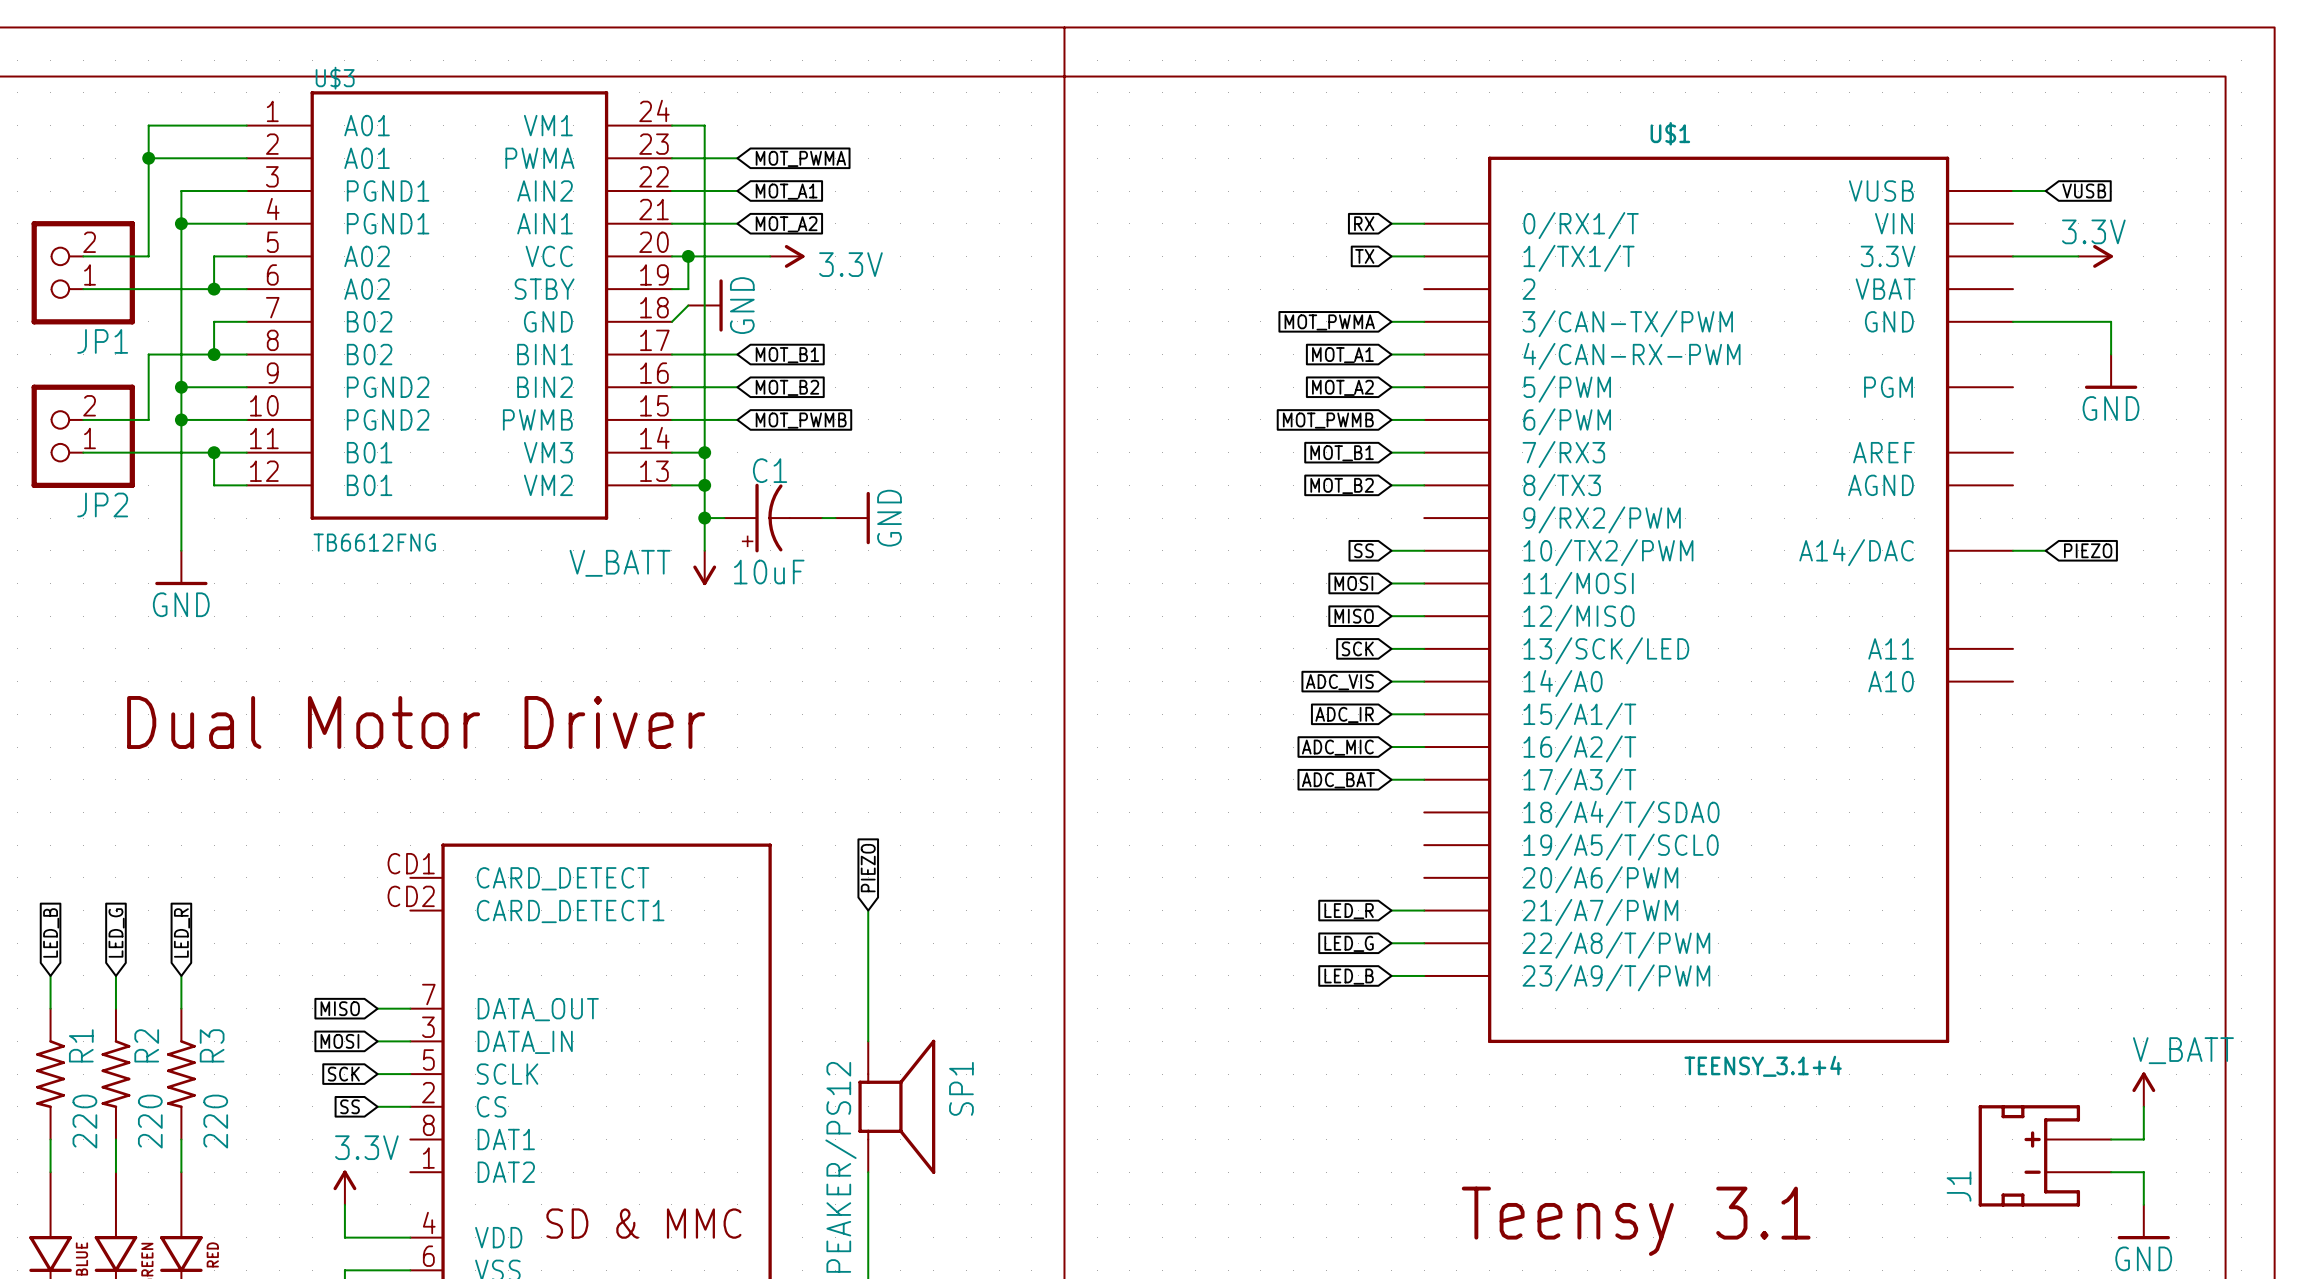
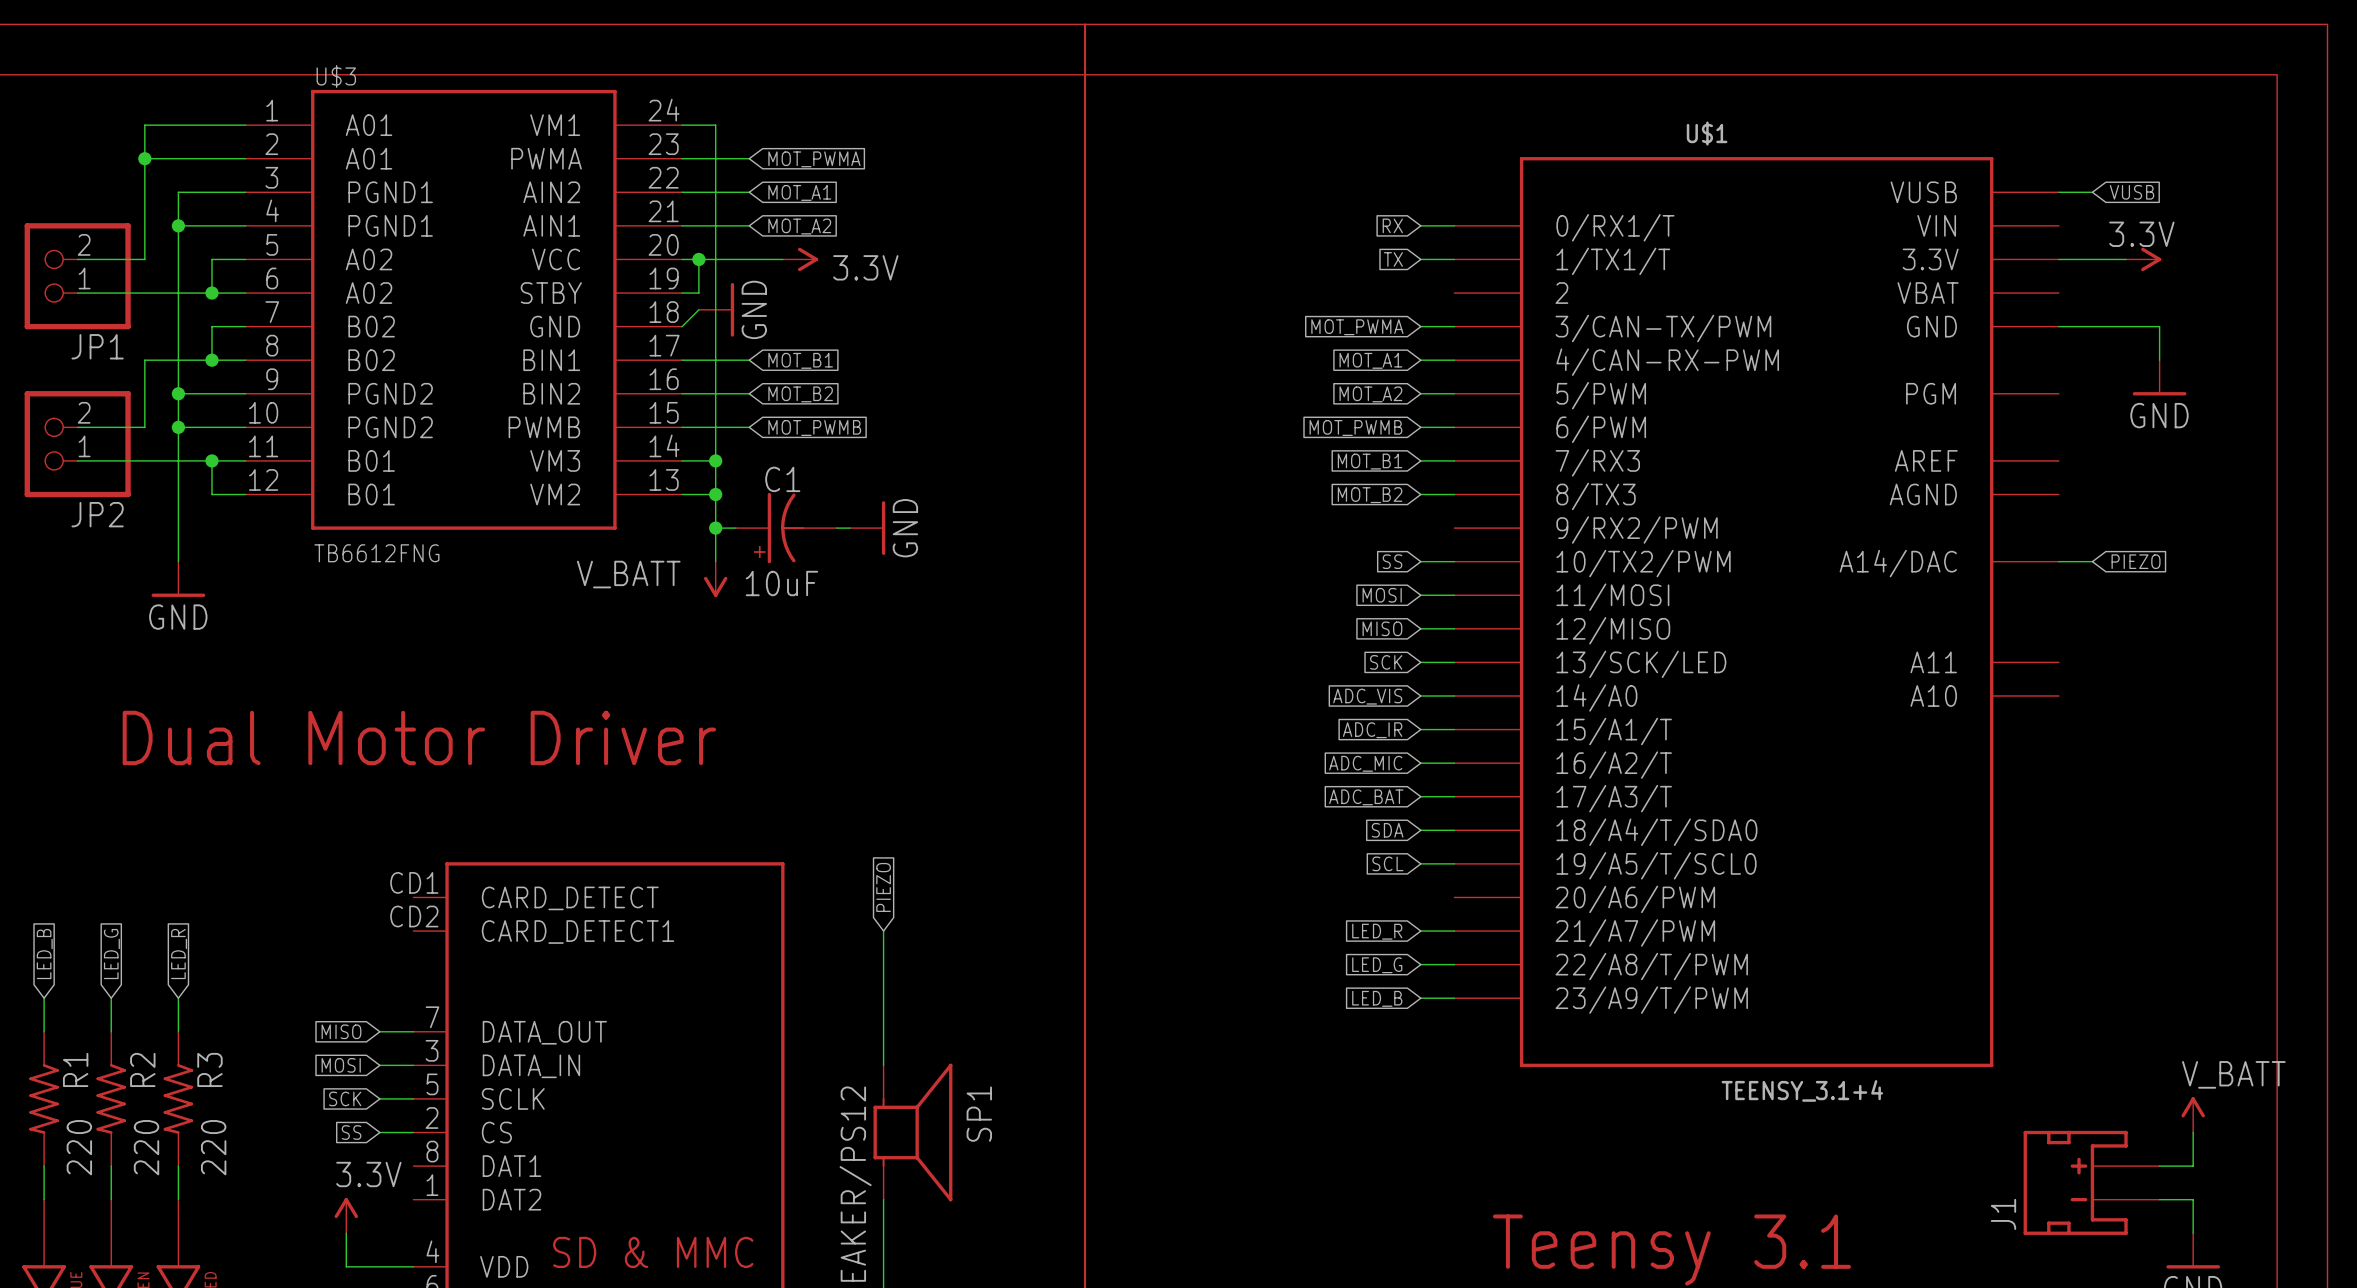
global label: none -> SDA (1387, 830)
wire: none -> (1420, 830) (1454, 830)
global label: none -> SCL (1387, 863)
wire: none -> (1420, 863) (1454, 863)

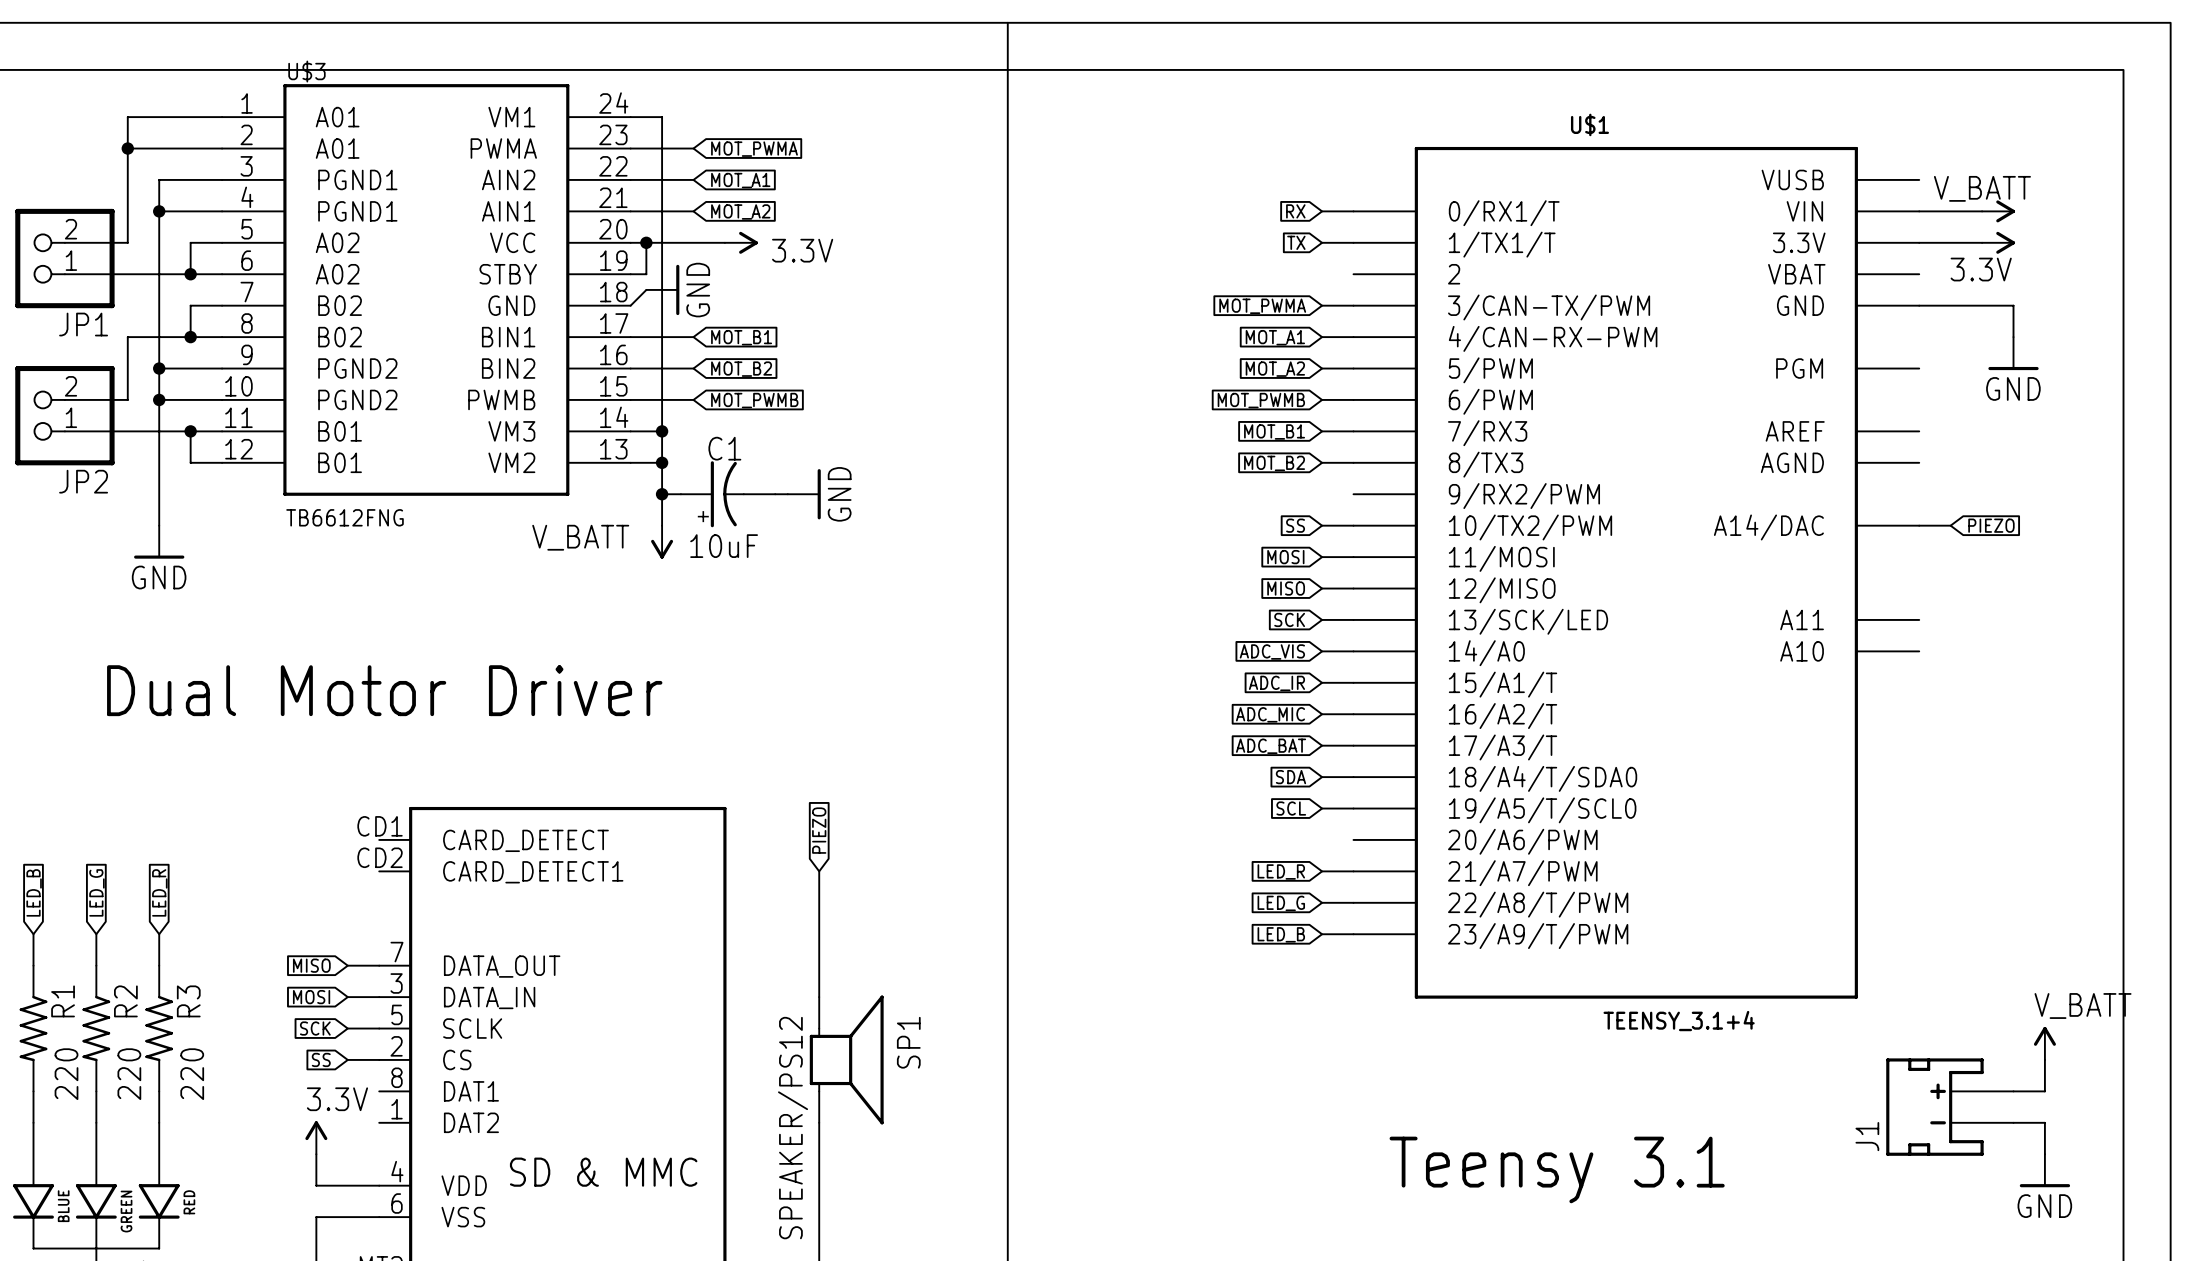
wire: (2058, 192) (2092, 192) -> none
global label: VUSB (2132, 192) -> none
wire: none -> (1919, 211) (1982, 211)
power symbol: none -> V_BATT (1998, 211)
power symbol text position: 3.3V (2141, 234) -> 3.3V (1981, 269)

